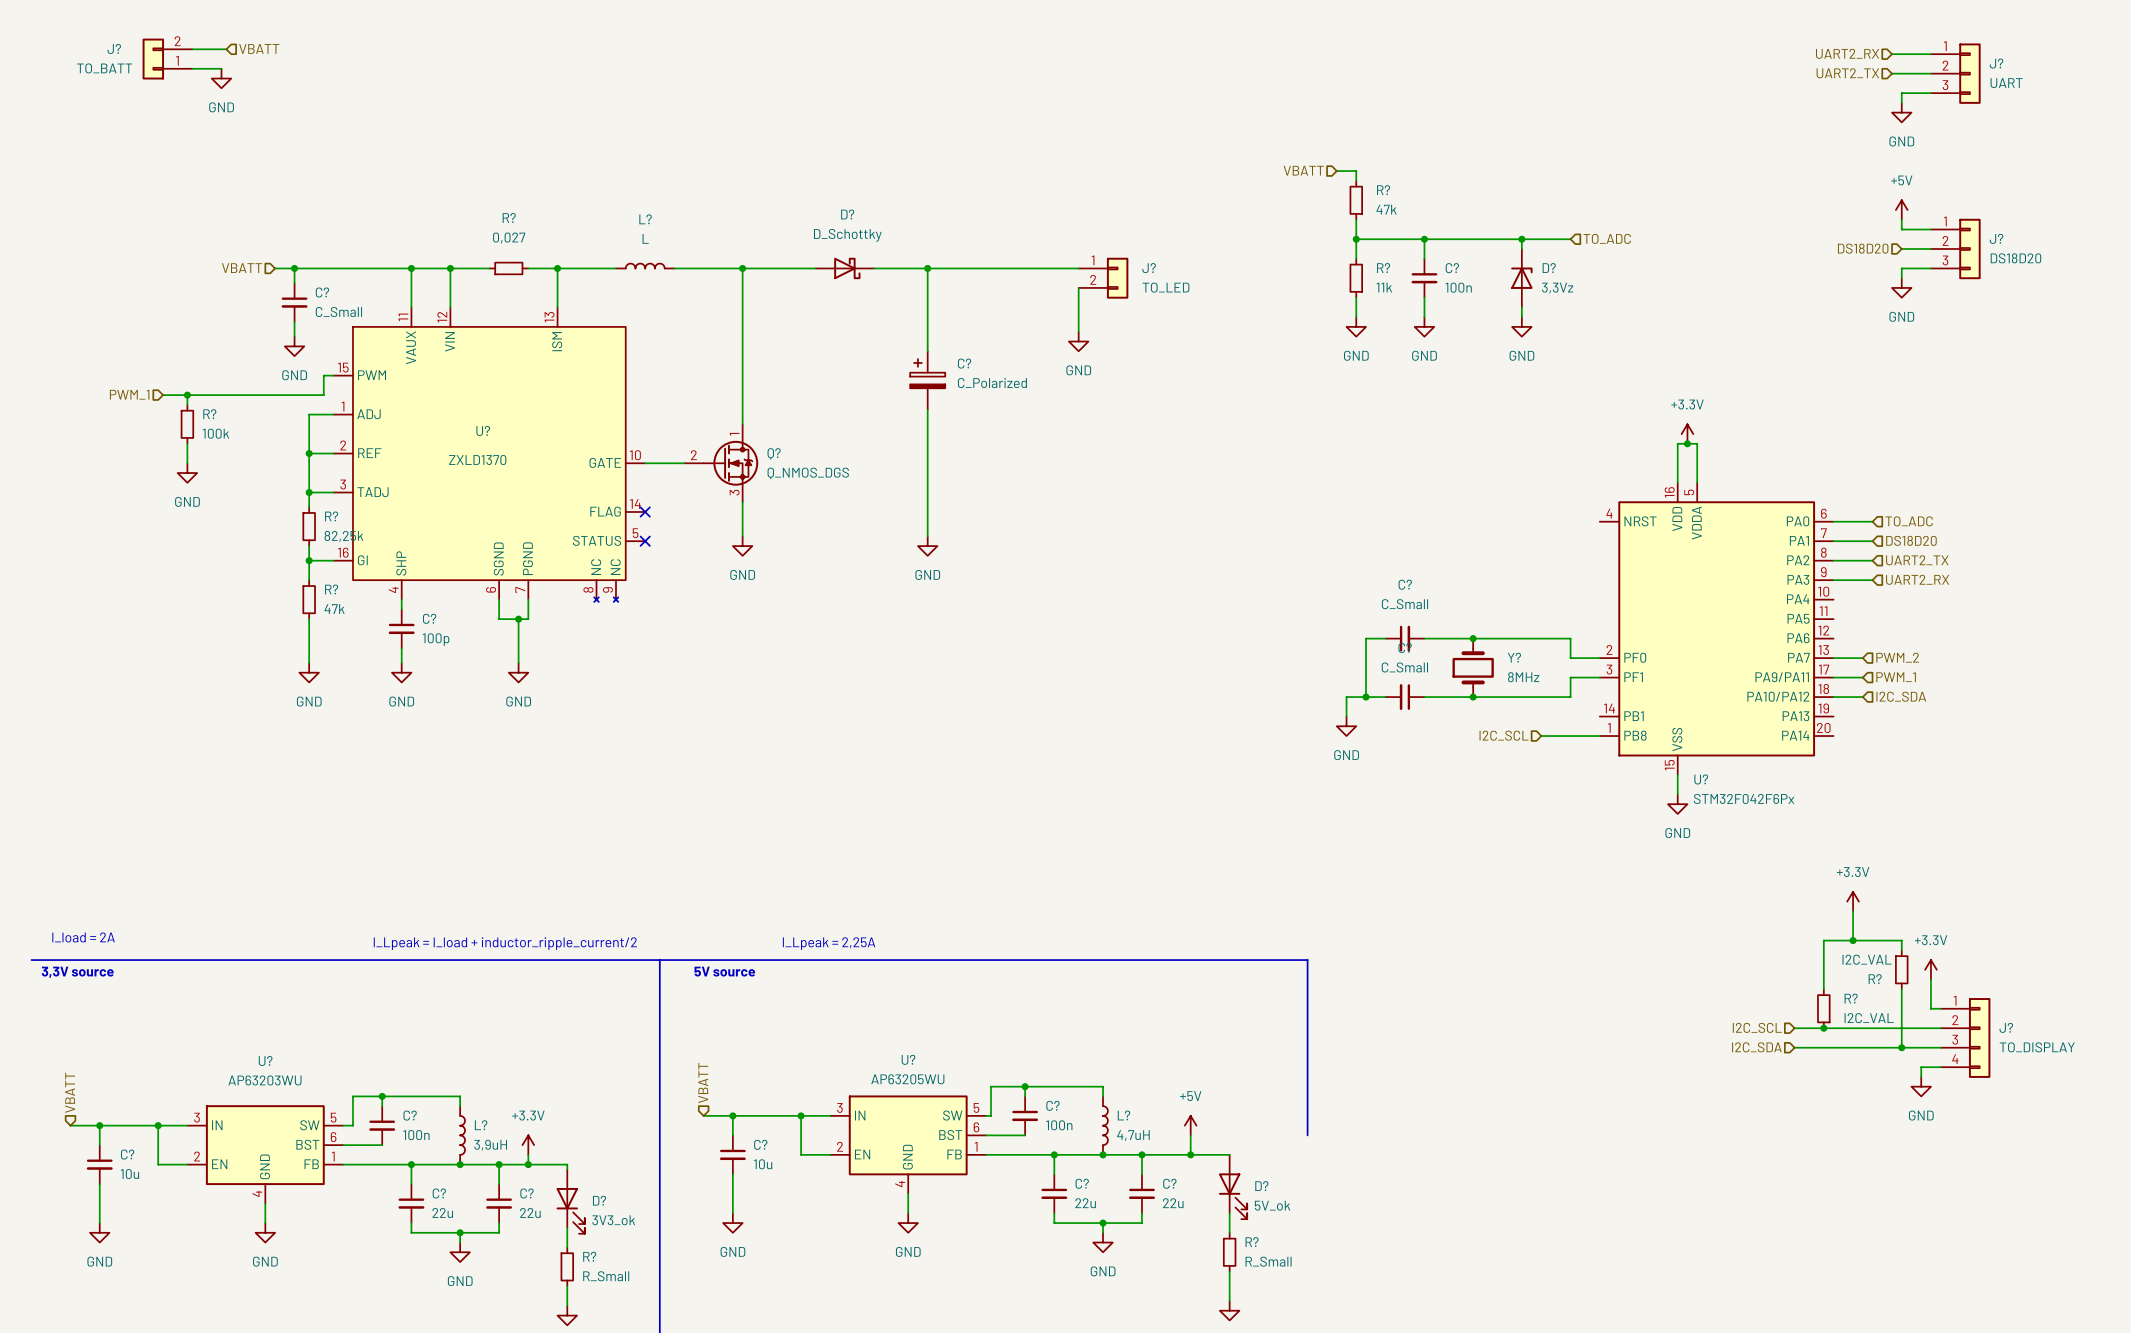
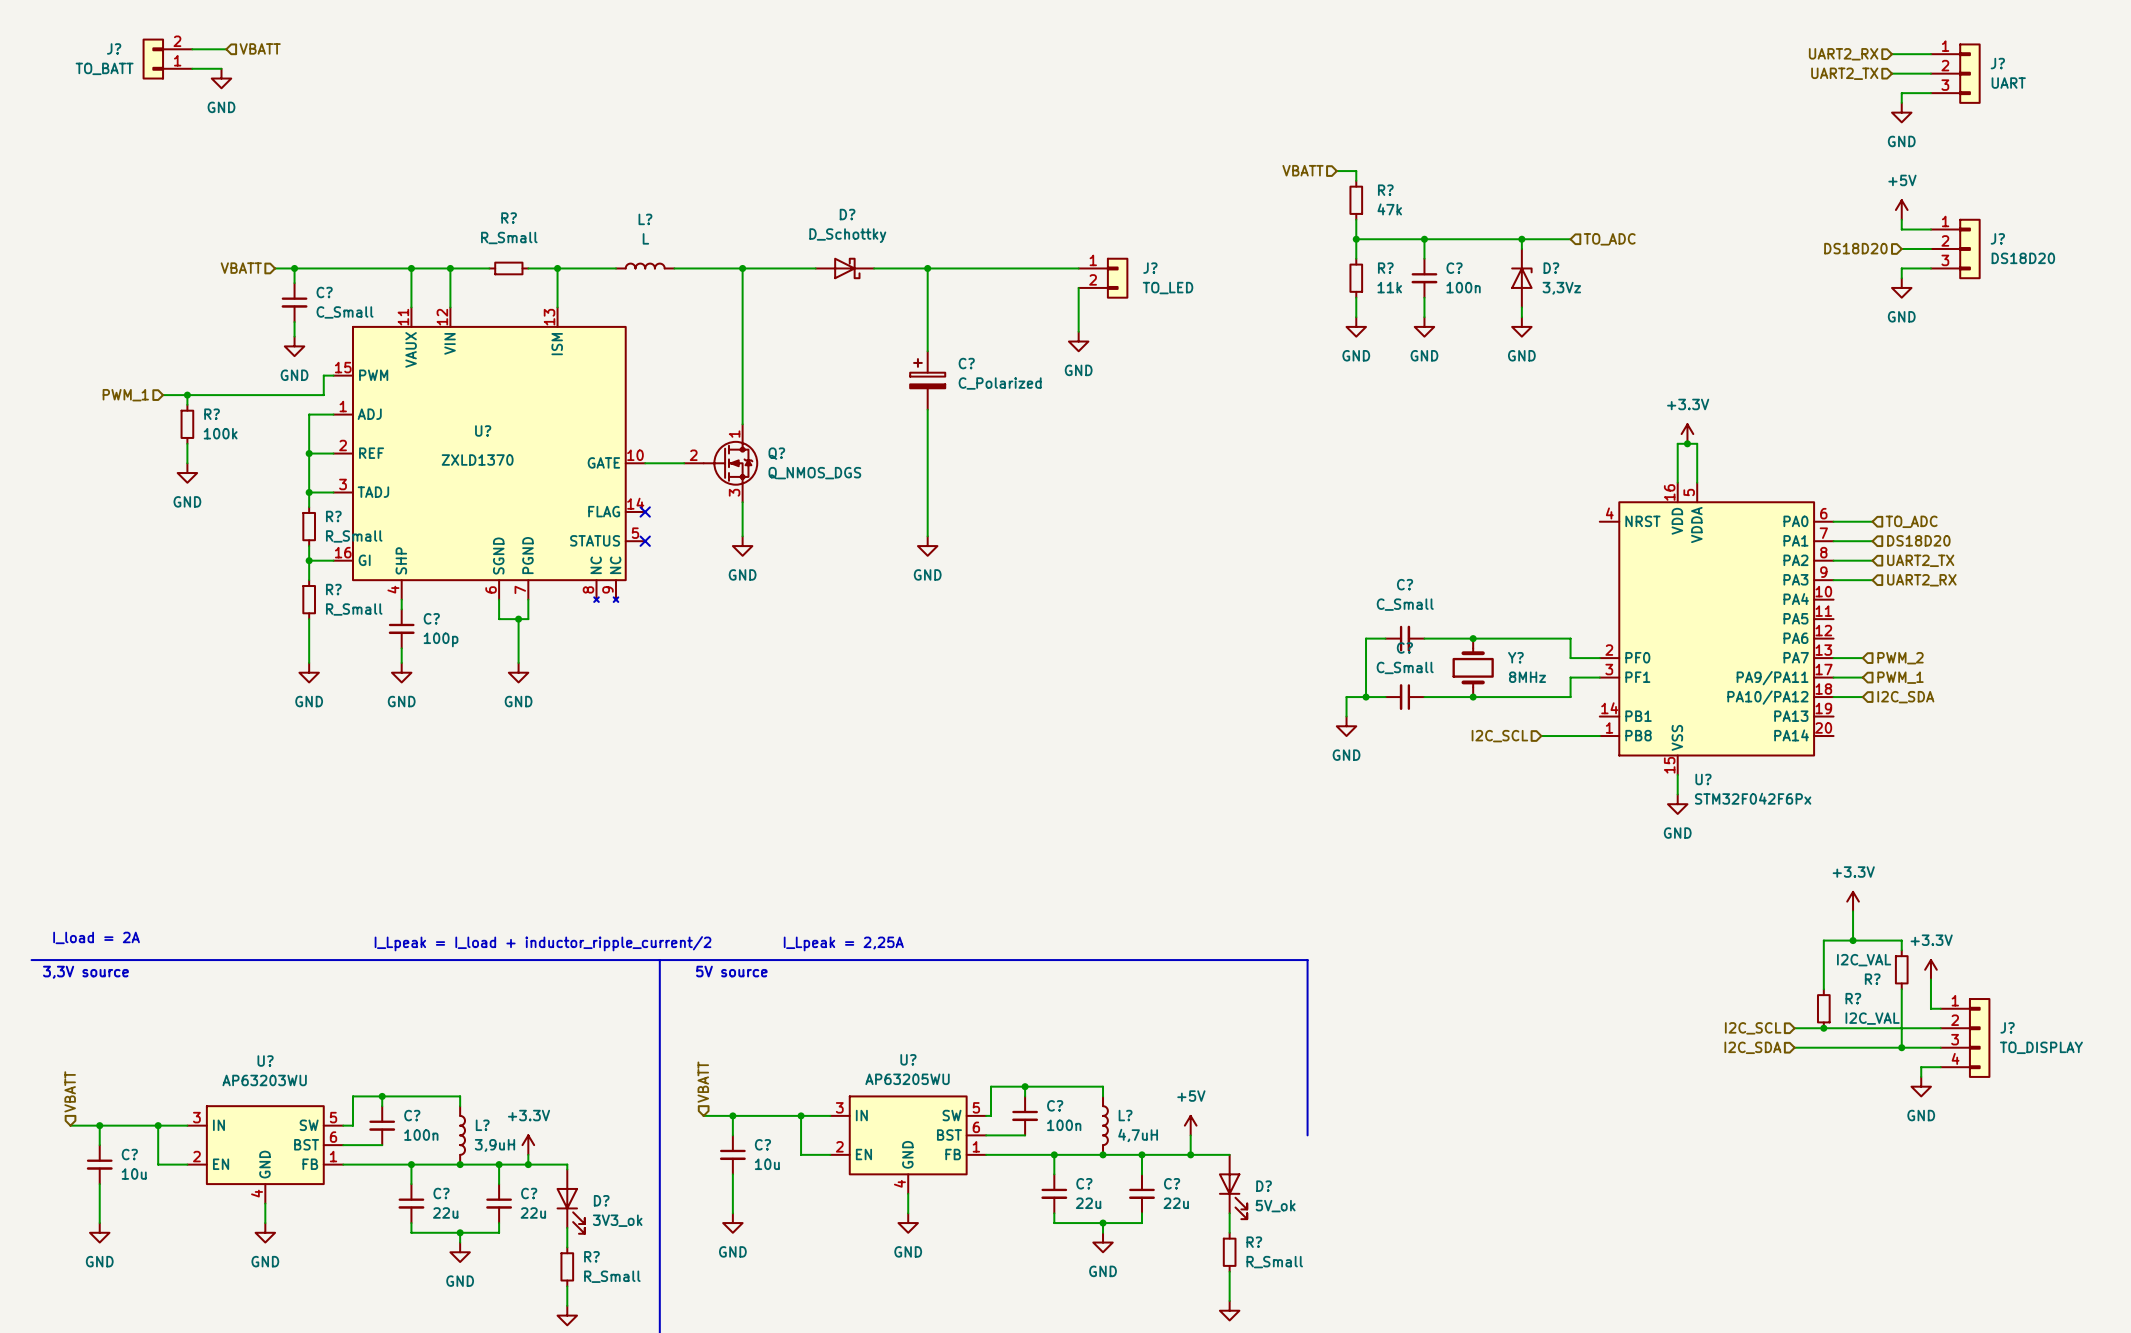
R? value: 0,027 (509, 238) -> R_Small (509, 237)
R? value: 82,25k (343, 536) -> R_Small (354, 536)
R? value: 47k (334, 609) -> R_Small (354, 609)

